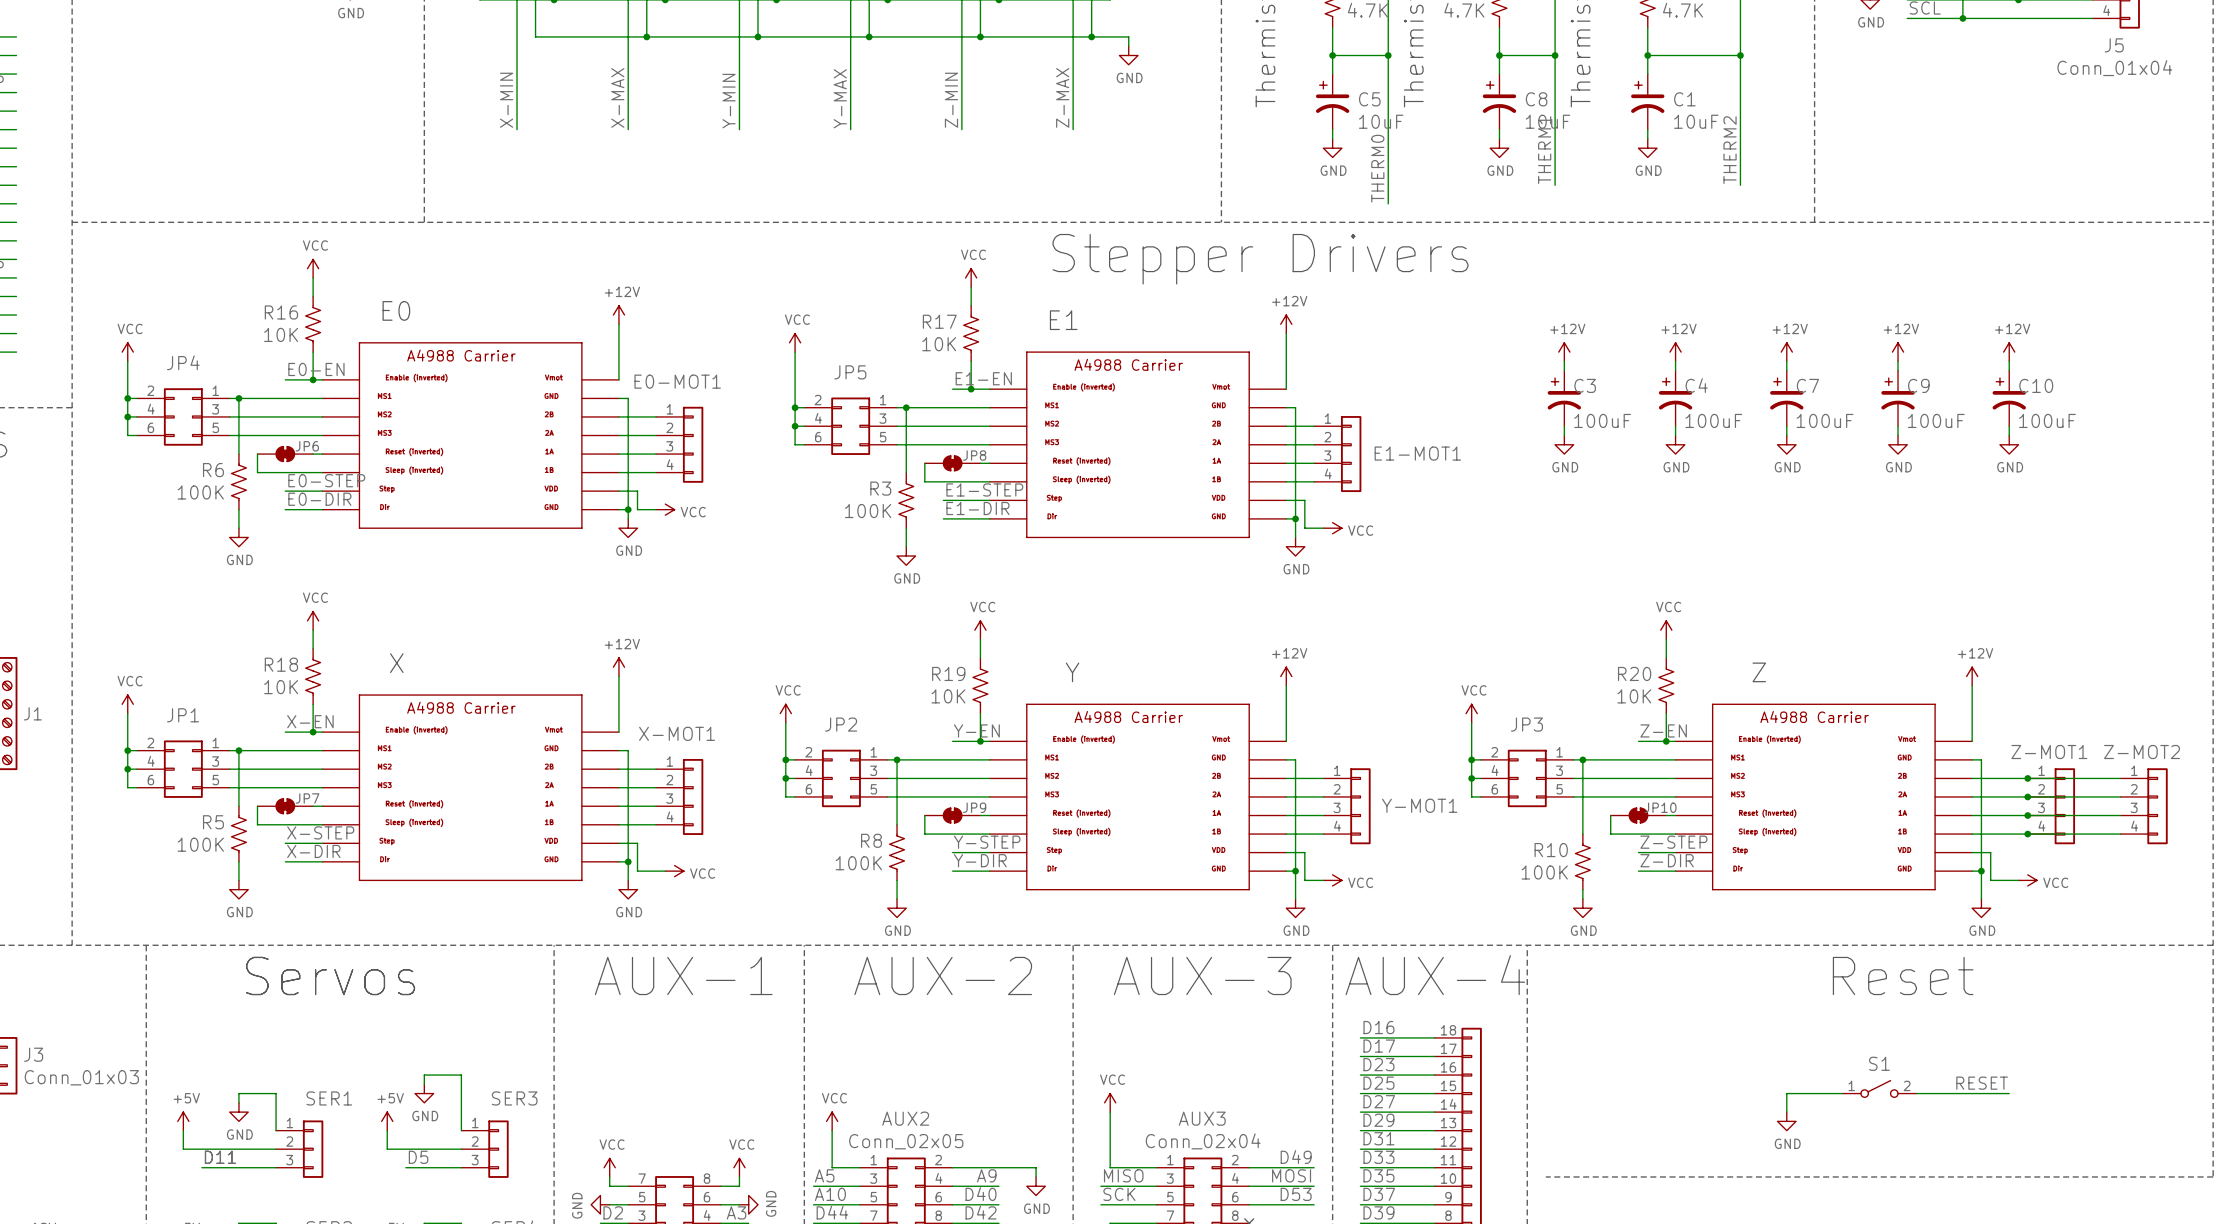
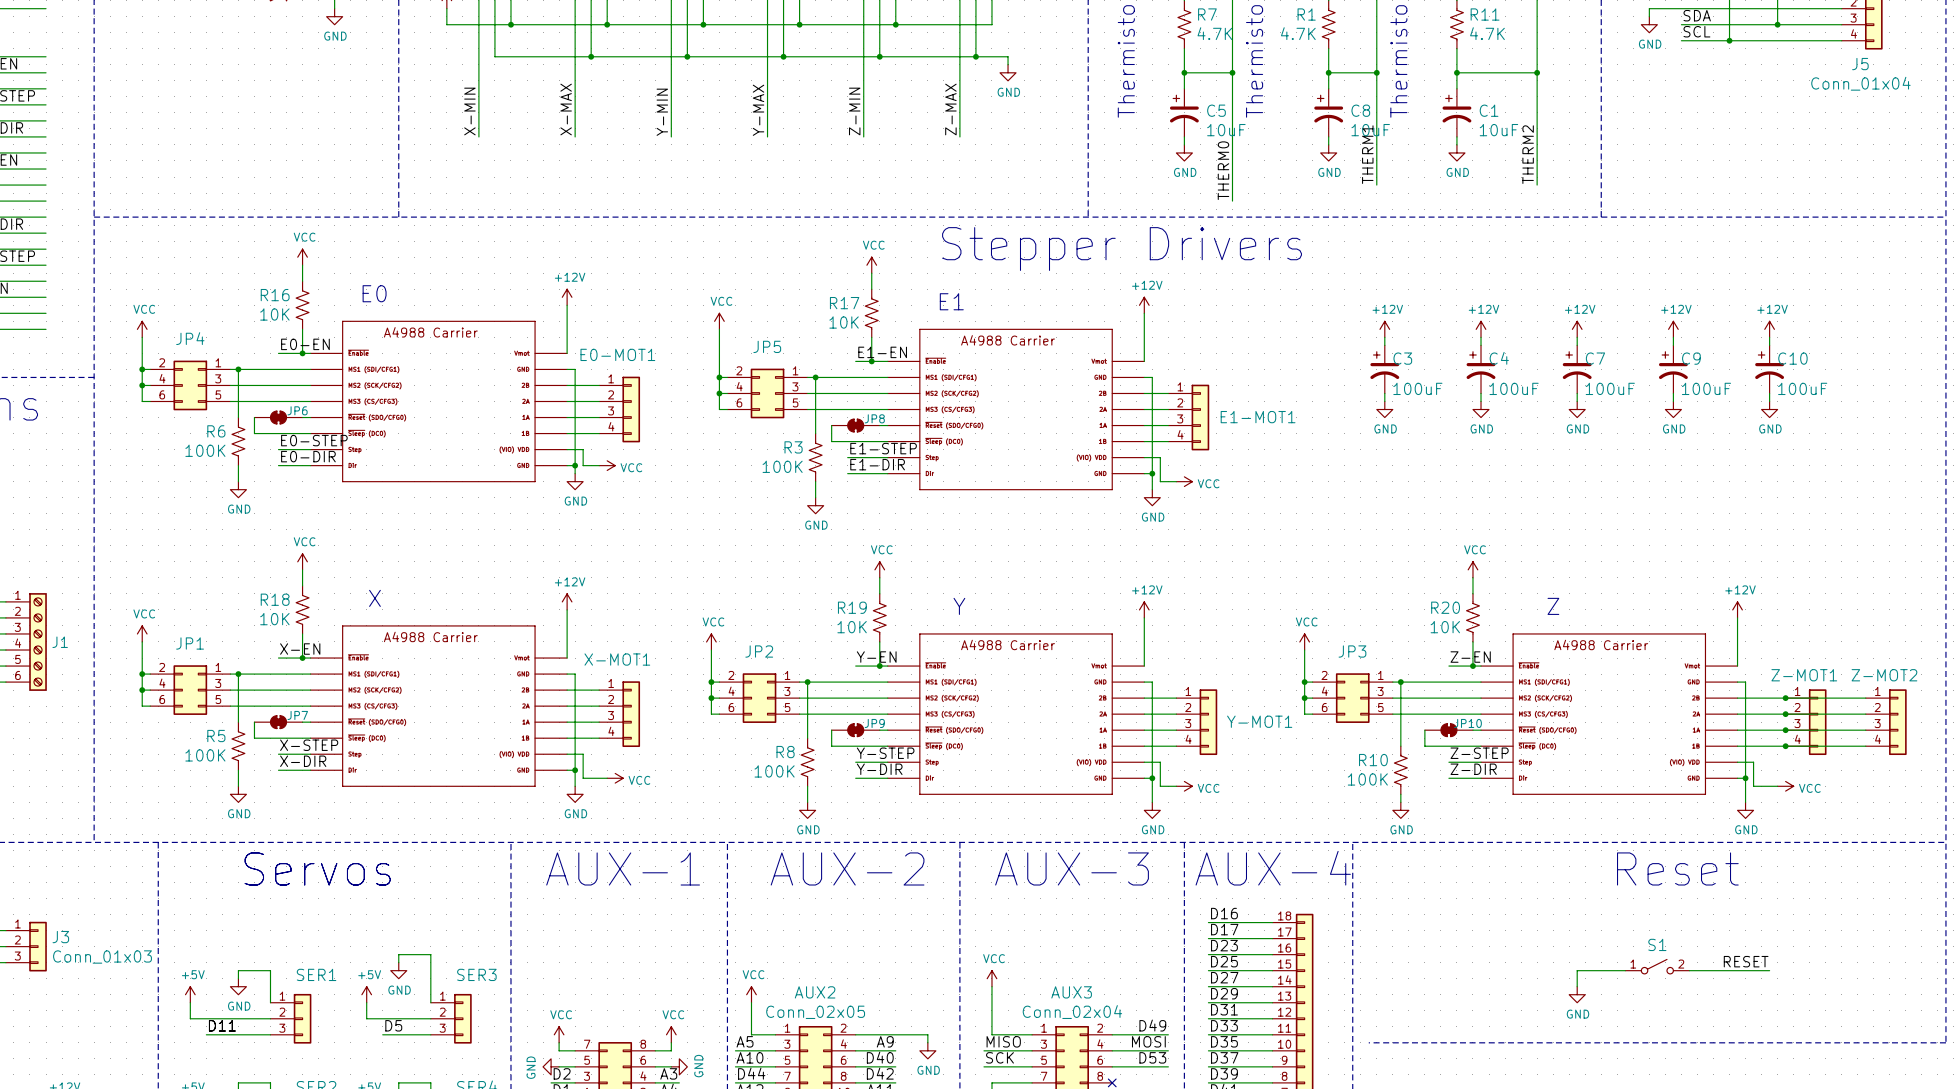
part symbol: [322, 342, 619, 529] -> [310, 321, 568, 482]
part symbol: [989, 352, 1287, 538] -> [887, 329, 1145, 490]
part symbol: [322, 695, 619, 881] -> [310, 625, 568, 787]
part symbol: [989, 704, 1287, 890] -> [887, 633, 1145, 795]
part symbol: [1675, 704, 1973, 890] -> [1481, 633, 1738, 795]

